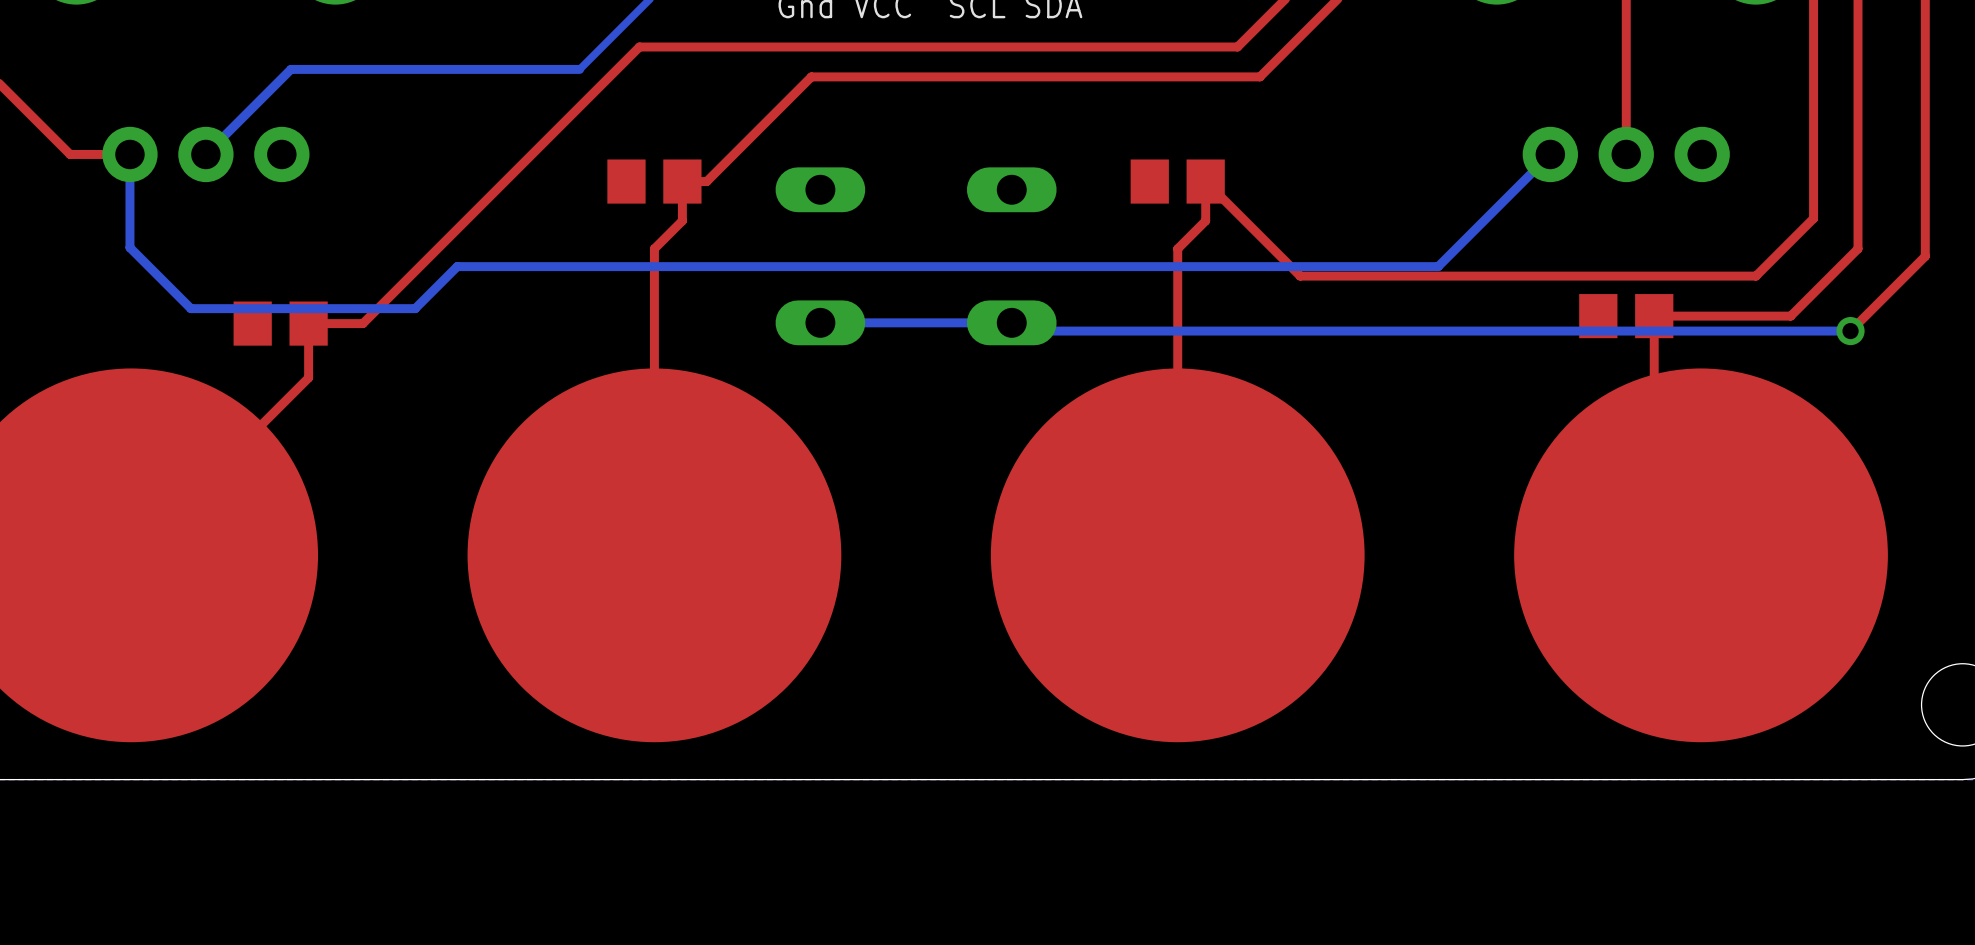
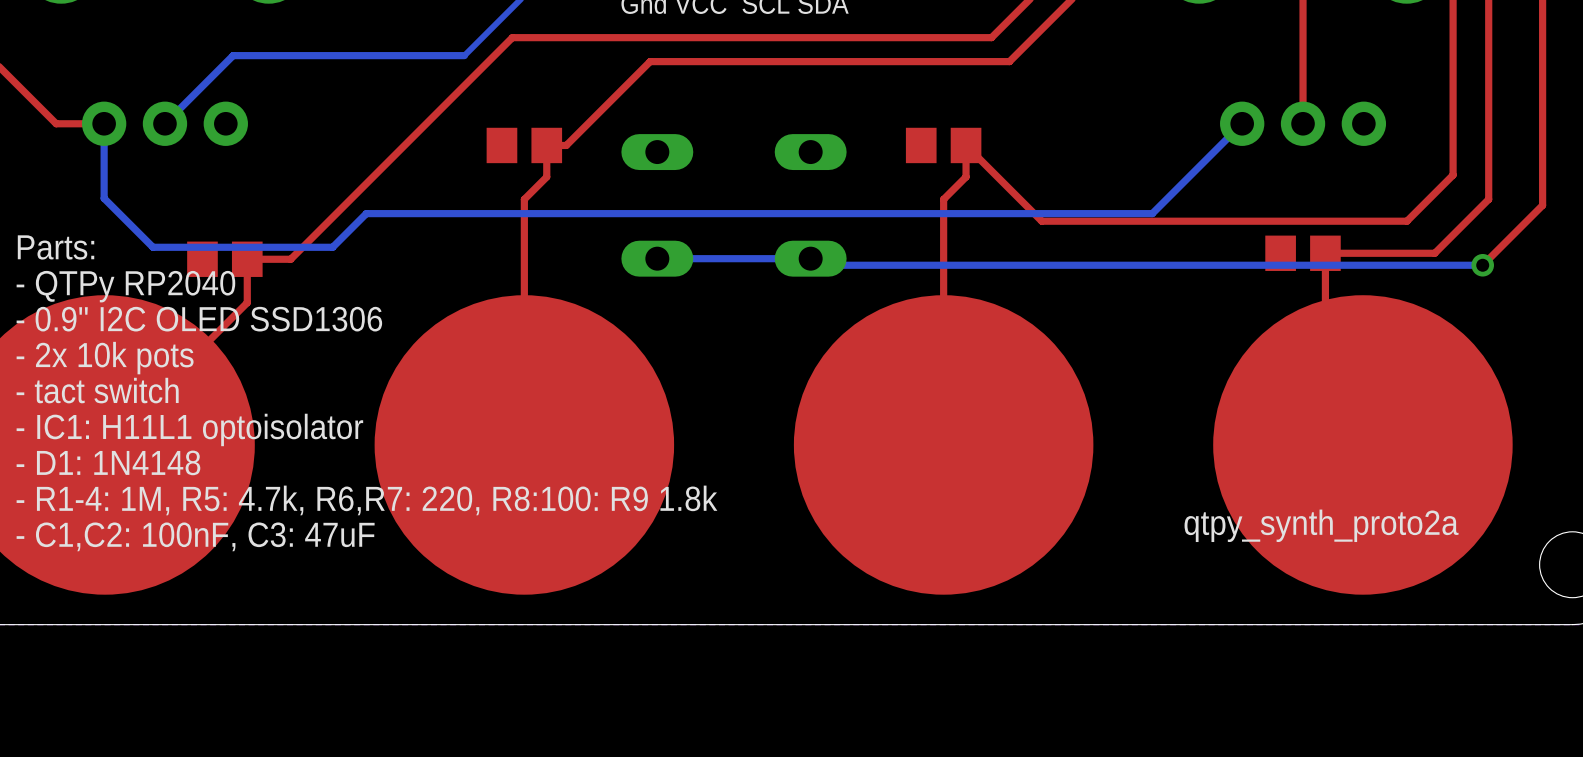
text: none -> Parts: (56, 247)
text: none -> - QTPy RP2040 (125, 286)
text: none -> - 0.9" I2C OLED SSD1306 (199, 319)
text: none -> - 2x 10k pots (105, 358)
text: none -> - tact switch (97, 390)
text: none -> - IC1: H11L1 optoisolator (189, 429)
text: none -> - D1: 1N4148 (108, 462)
text: none -> - R1-4: 1M, R5: 4.7k, R6,R7: 220, R8:100: R9 1.8k (366, 500)
text: none -> qtpy_synth_proto2a (1321, 525)
text: none -> - C1,C2: 100nF, C3: 47uF (195, 536)

